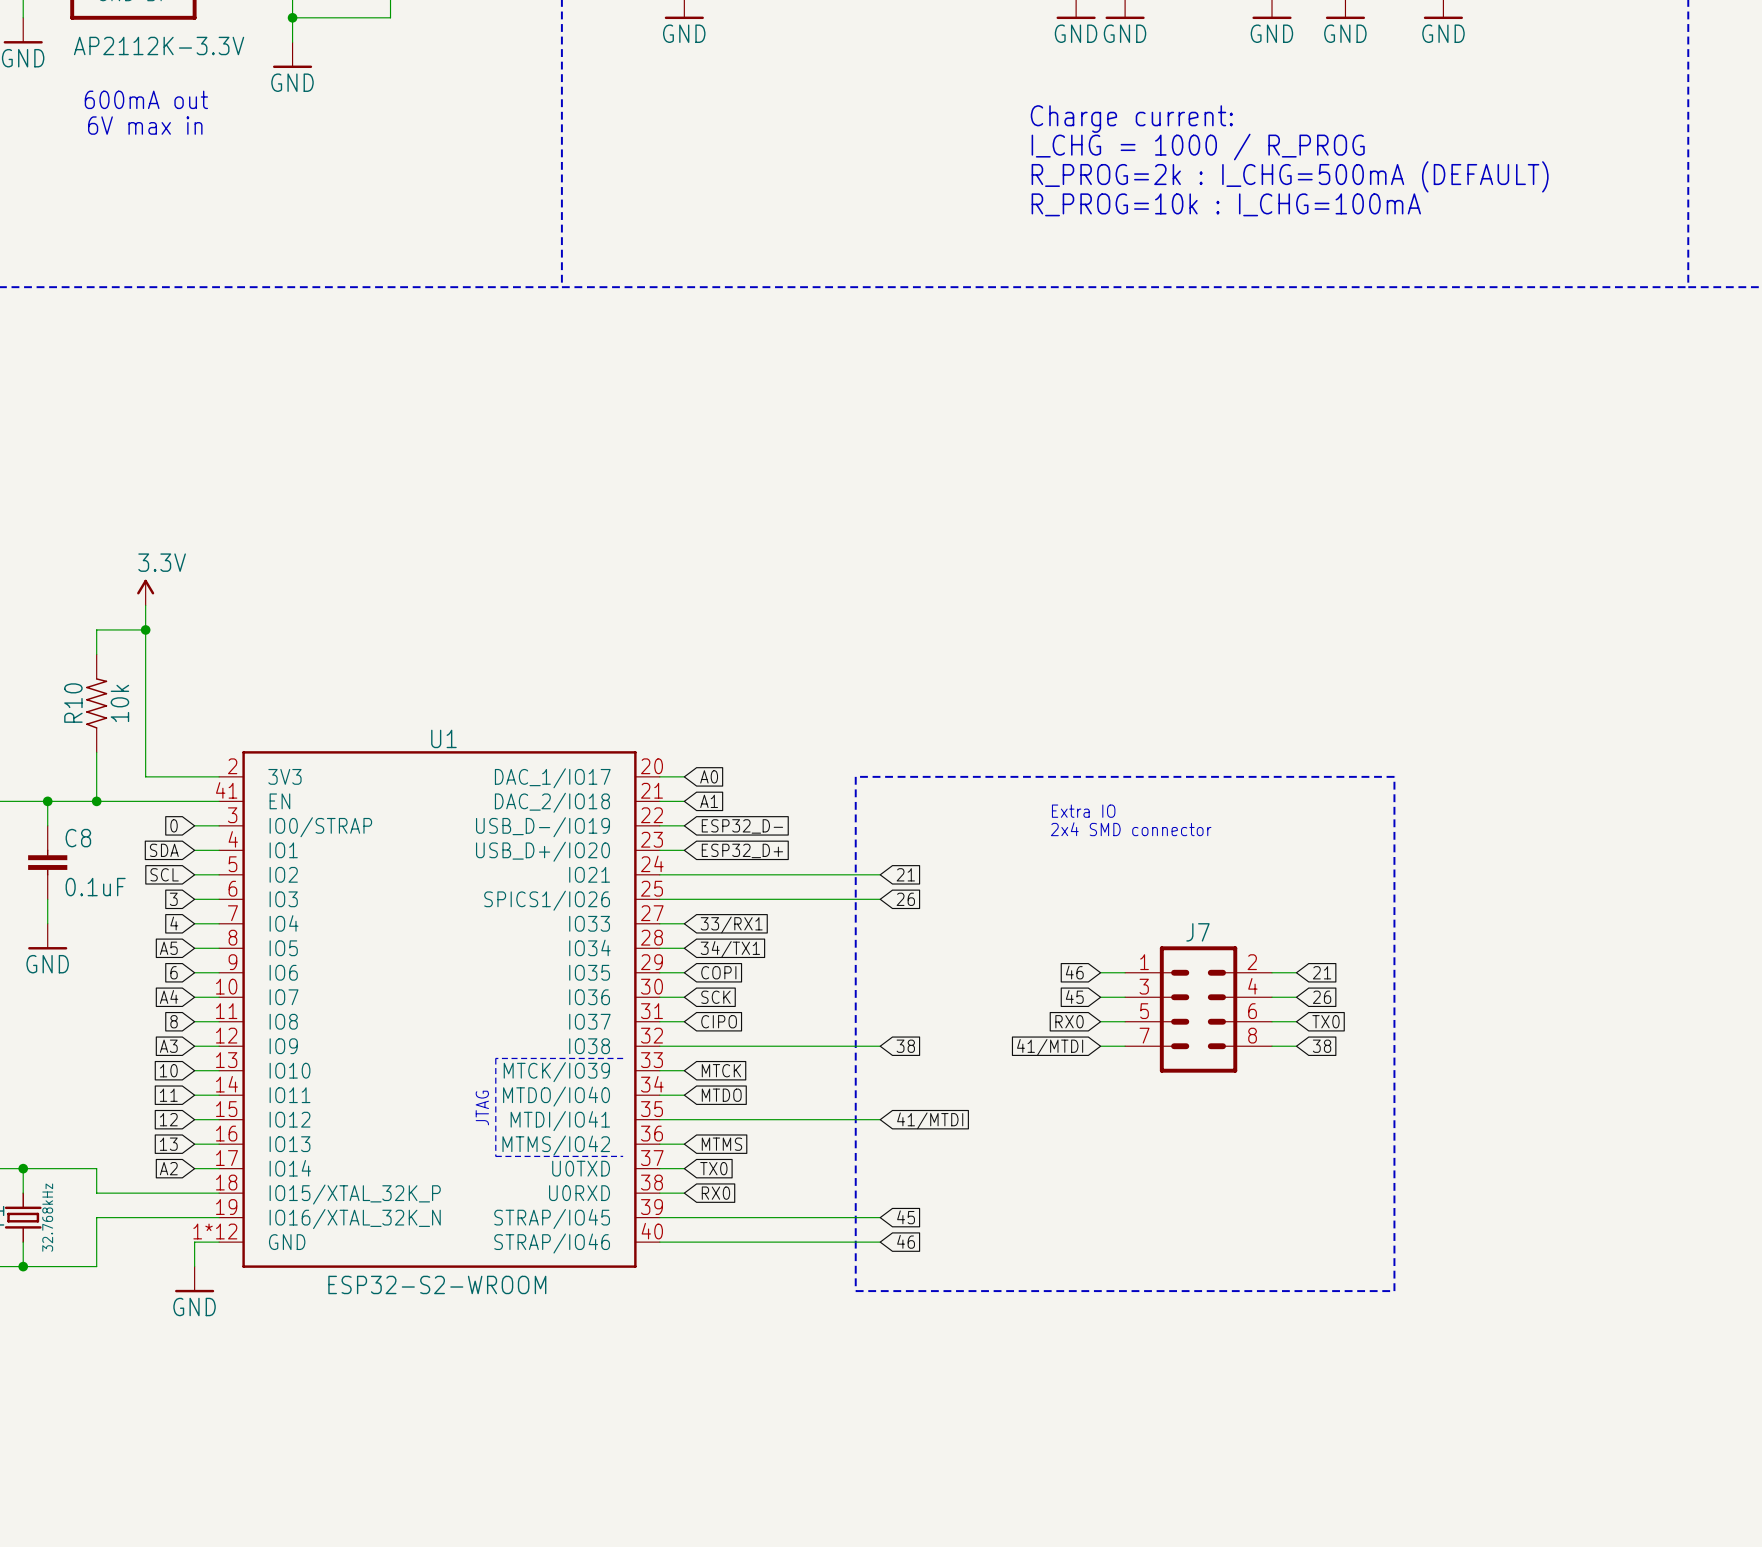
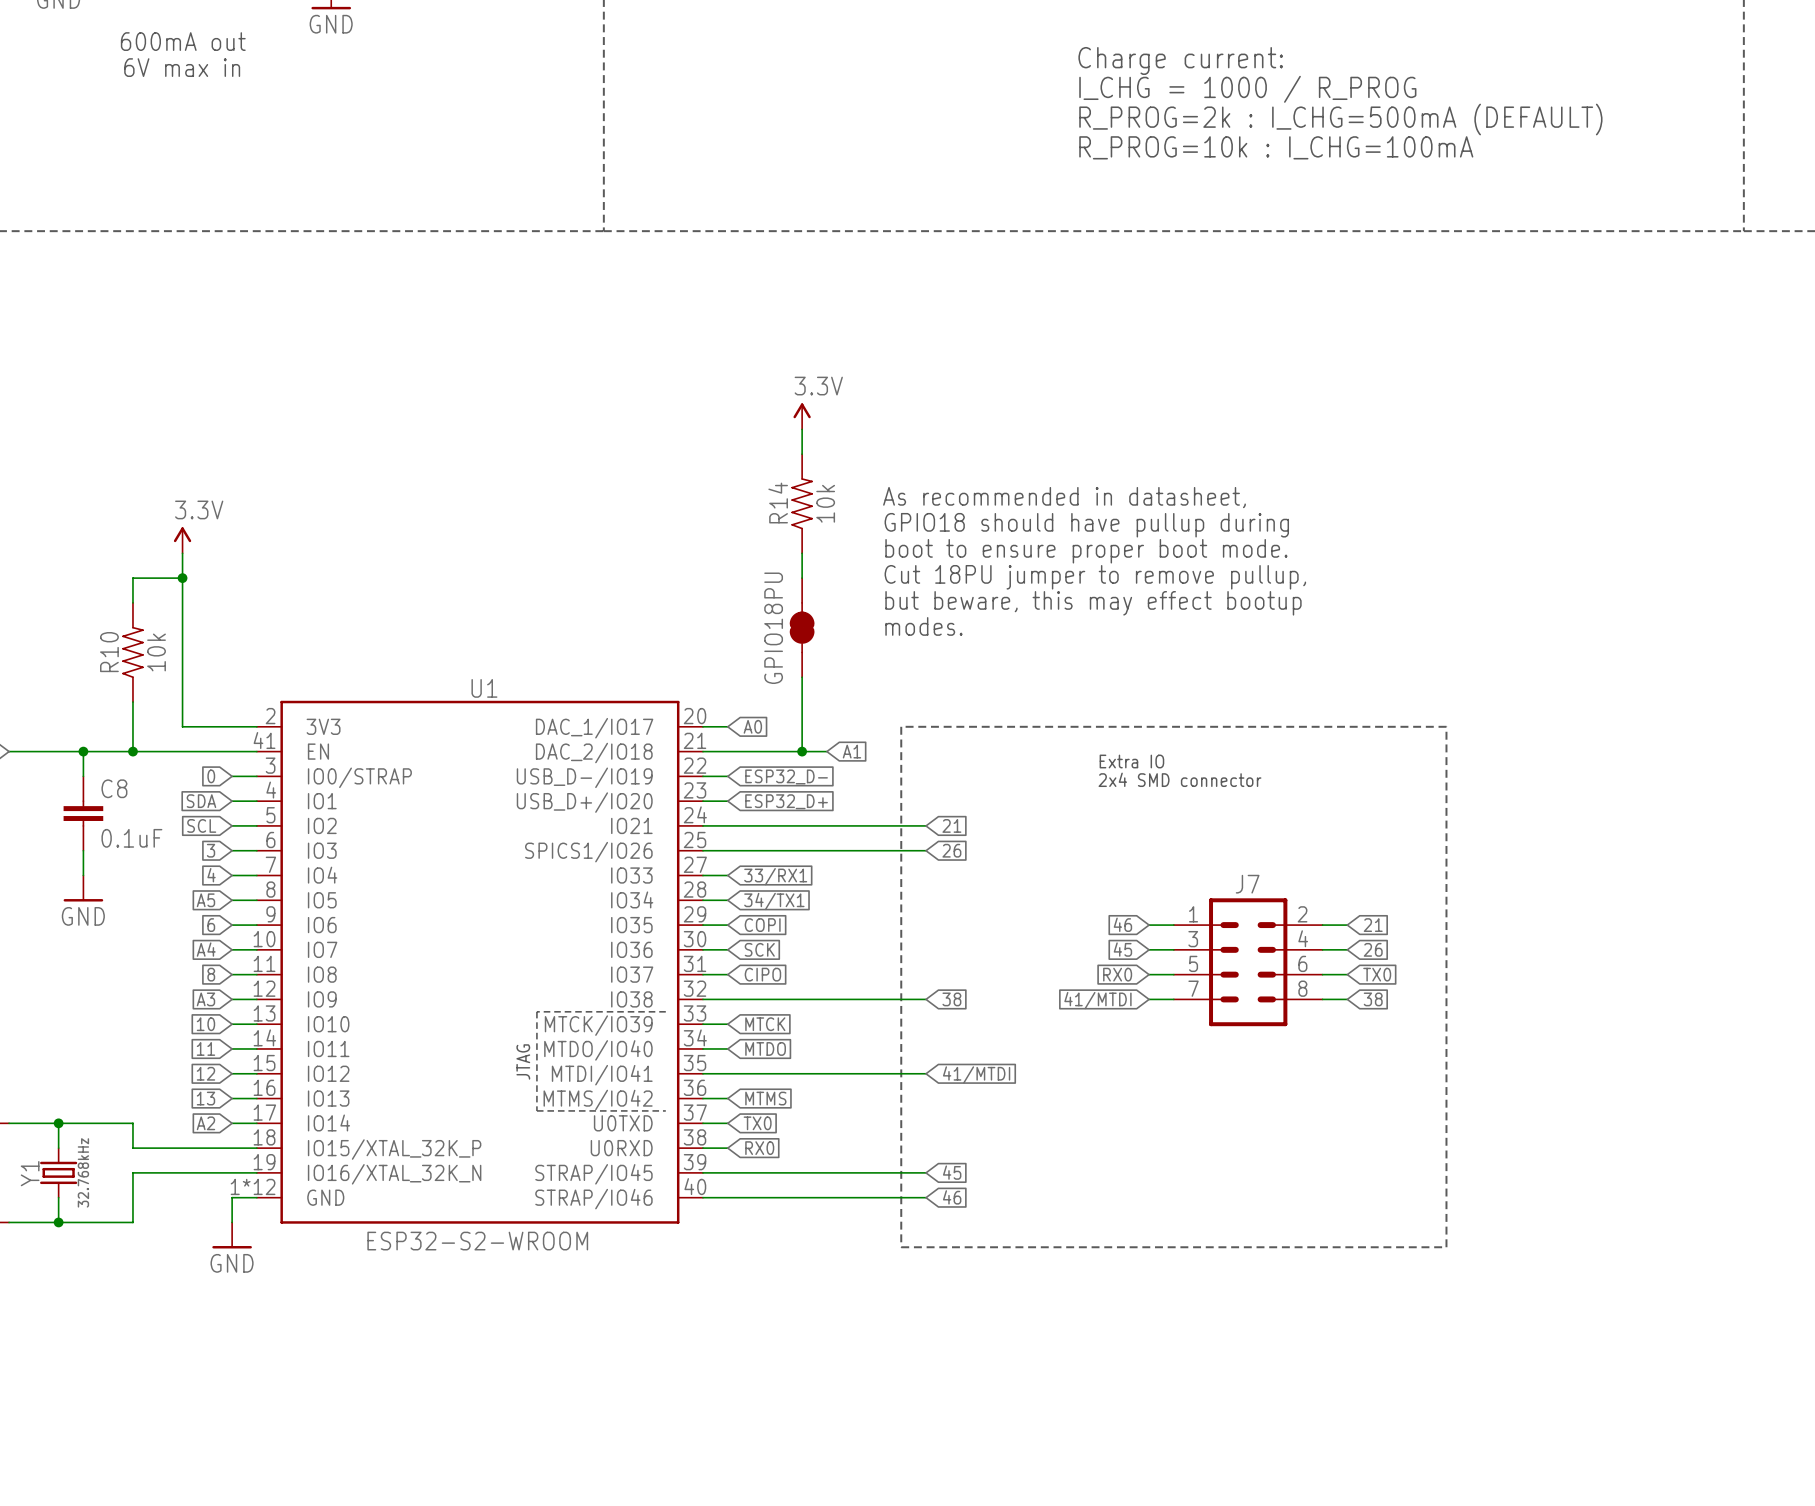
power symbol: none -> 3.3V (802, 416)
wire: none -> (802, 429) (802, 454)
text: none -> As recommended in datasheet, (1064, 497)
R14: none -> 10k (802, 503)
text: none -> GPIO18 should have pullup during (1086, 525)
text: none -> boot to ensure proper boot mode. (1086, 551)
wire: none -> (802, 553) (802, 578)
text: none -> Cut 18PU jumper to remove pullup, (1095, 577)
text: none -> but beware, this may effect bootup (1093, 603)
text: none -> modes. (923, 626)
GPIO18PU: none -> (802, 627)
wire: none -> (802, 677) (802, 751)
wire: none -> (727, 751) (826, 751)
global label position: A1 (709, 801) -> A1 (851, 751)
junction: none -> (802, 751)

